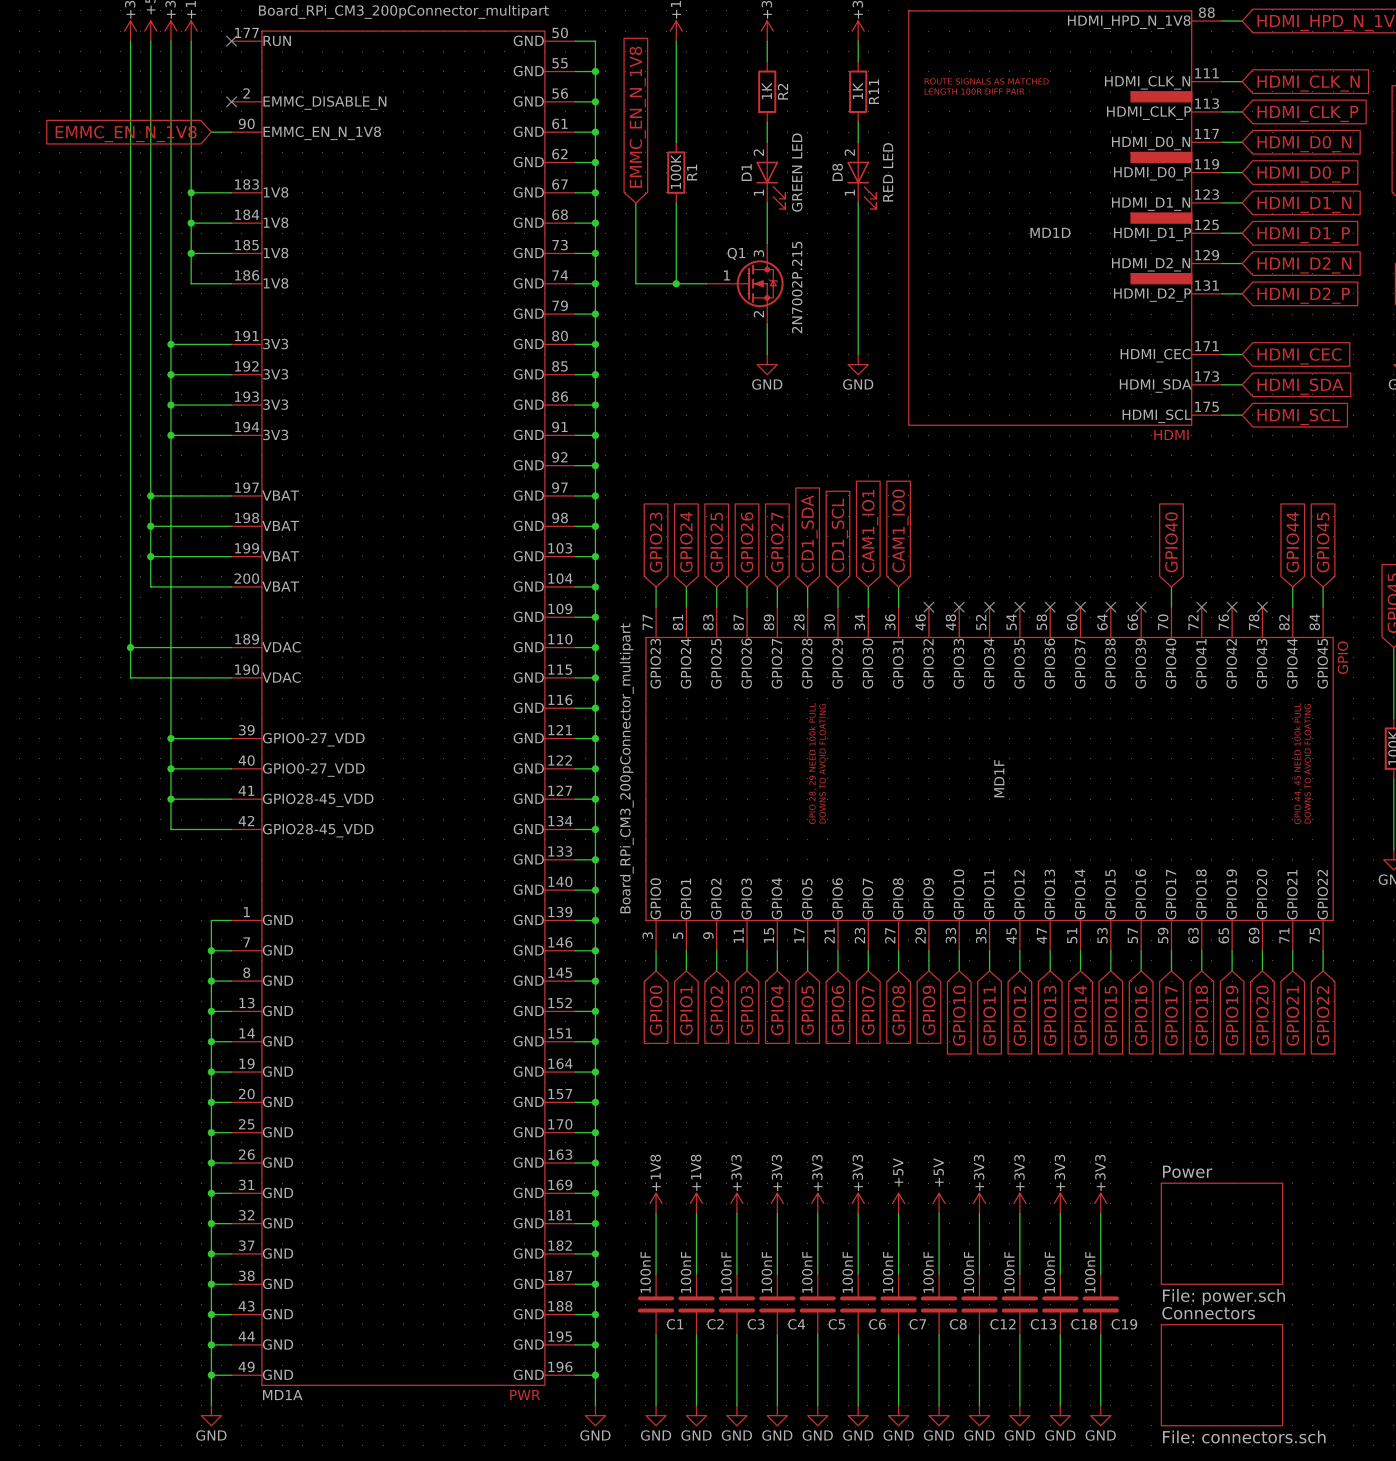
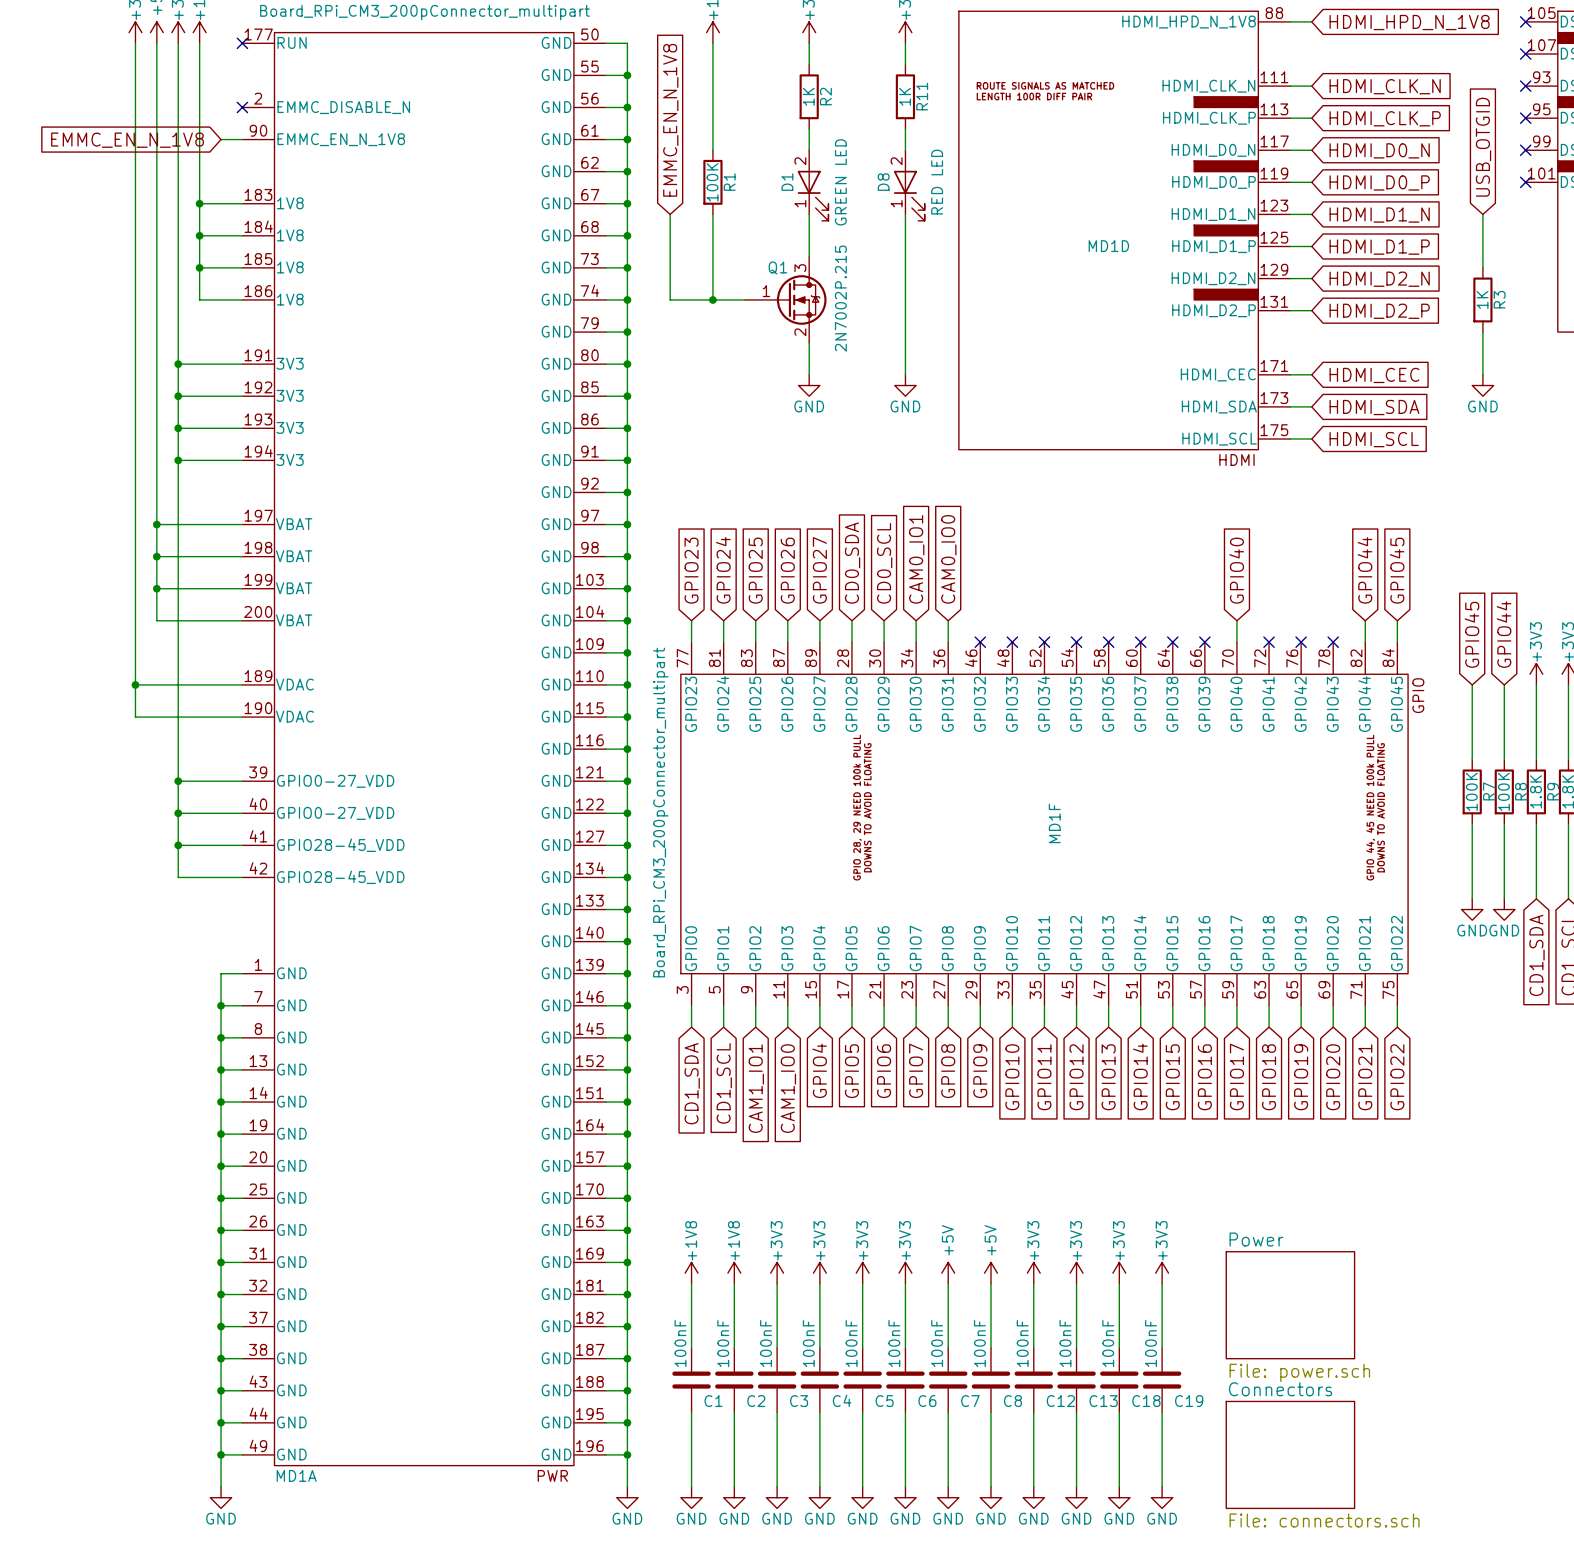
global label: CAM1_IO0 (900, 530) -> CAM0_IO0 (948, 559)
global label: CAM1_IO1 (870, 531) -> CAM0_IO1 (916, 559)
global label: CD1_SDA (809, 533) -> CD0_SDA (852, 563)
global label: CD1_SCL (839, 535) -> CD0_SCL (884, 563)
global label: GPIO0 (656, 1010) -> CD1_SDA (692, 1083)
global label: GPIO1 (686, 1010) -> CD1_SCL (724, 1083)
global label: GPIO2 (716, 1010) -> CAM1_IO1 (756, 1088)
global label: GPIO3 (747, 1010) -> CAM1_IO0 (788, 1088)

